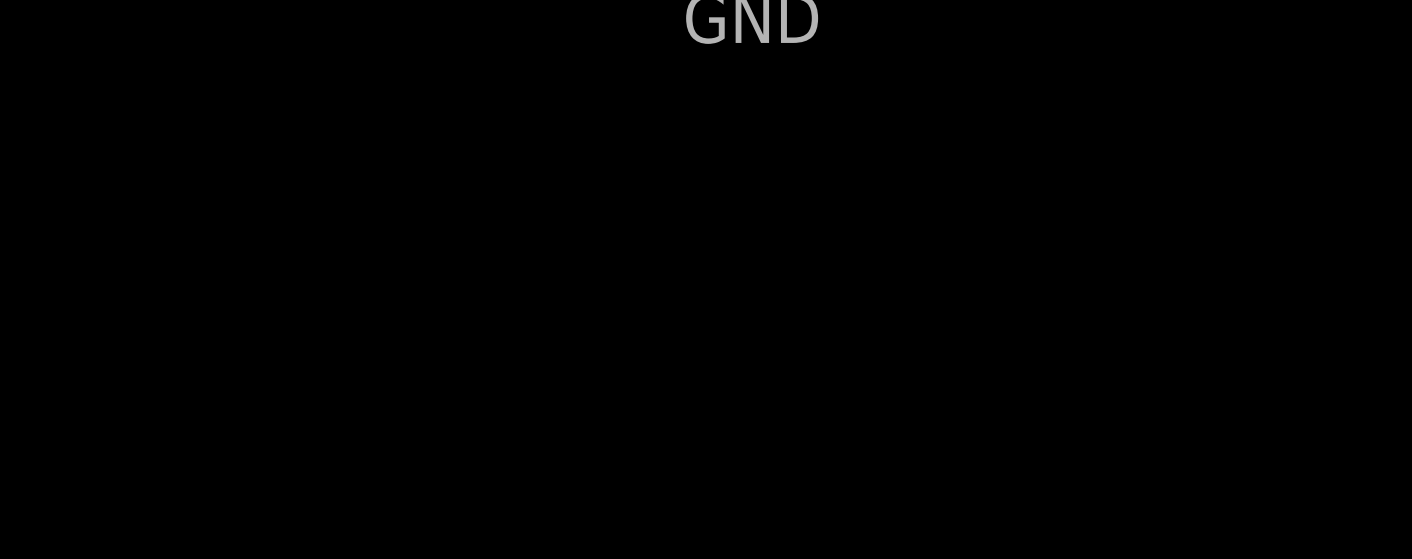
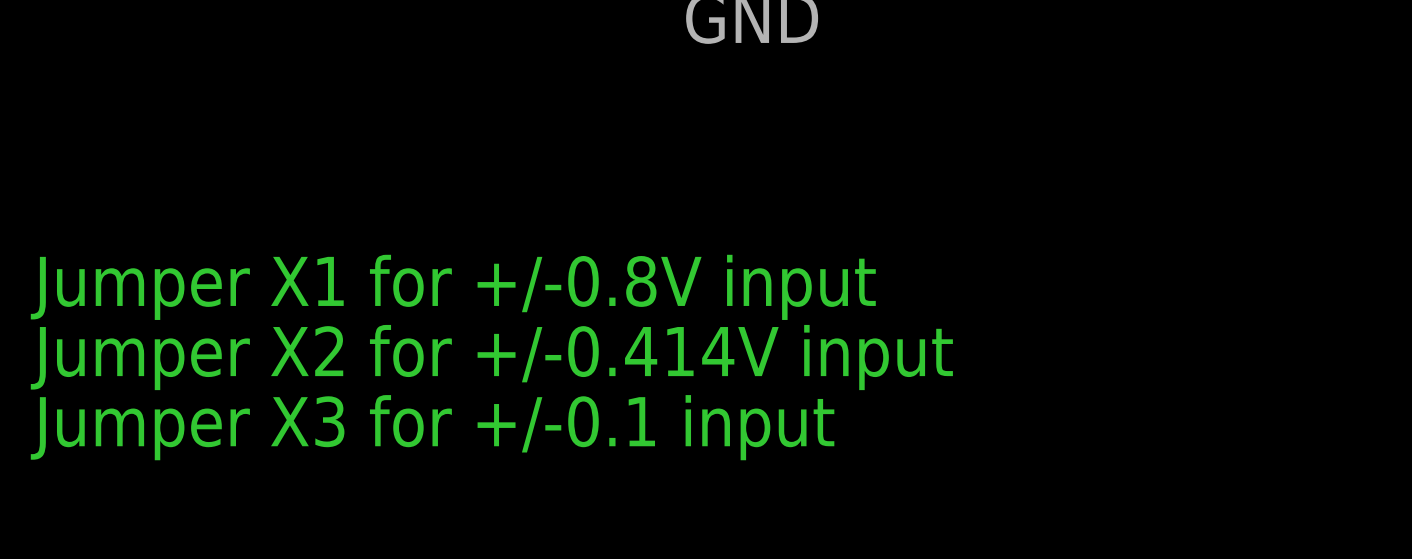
text: none -> Jumper X1 for +/-0.8V input (453, 287)
text: none -> Jumper X2 for +/-0.414V input (491, 357)
text: none -> Jumper X3 for +/-0.1 input (432, 427)

